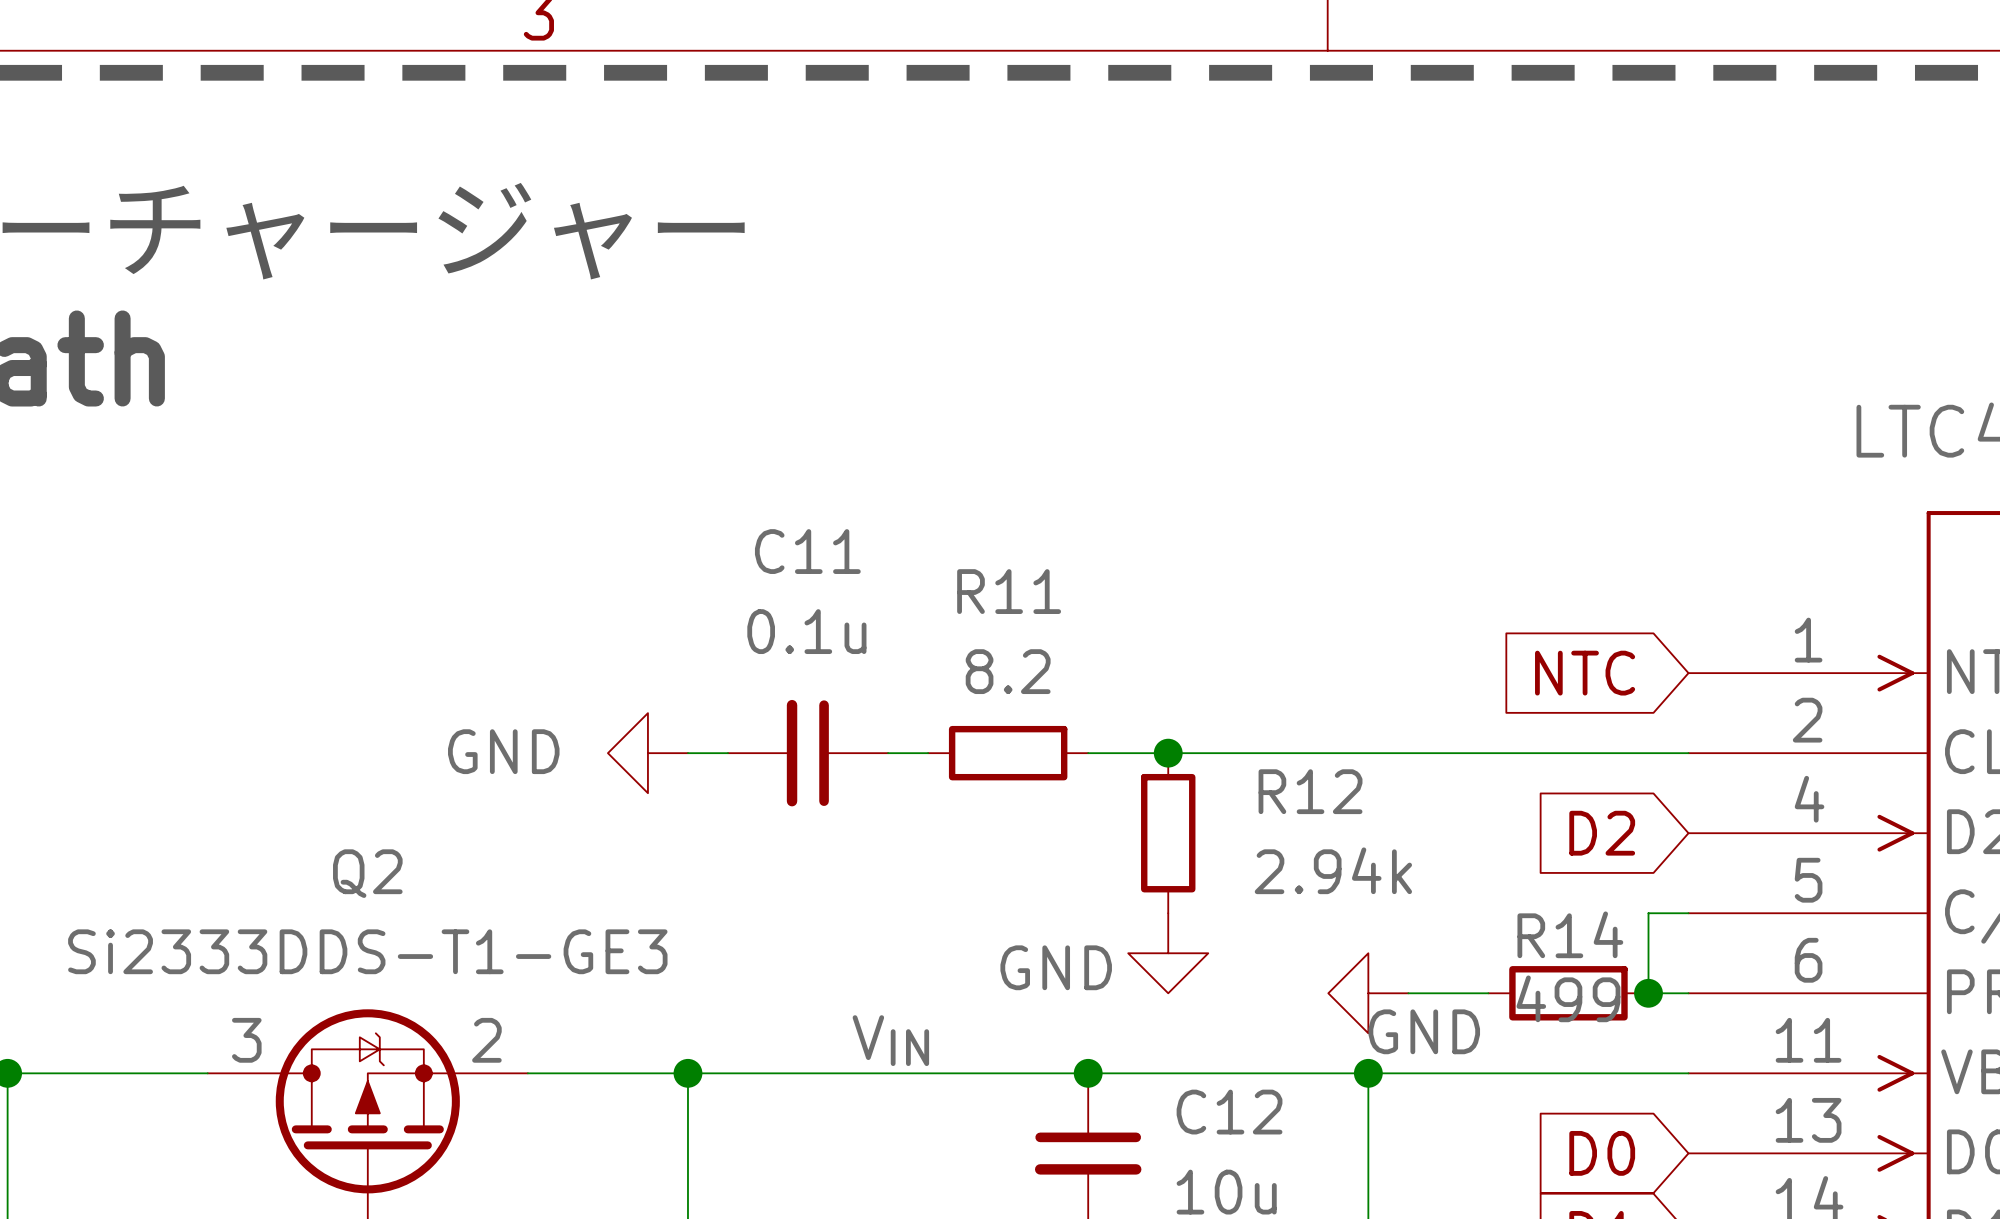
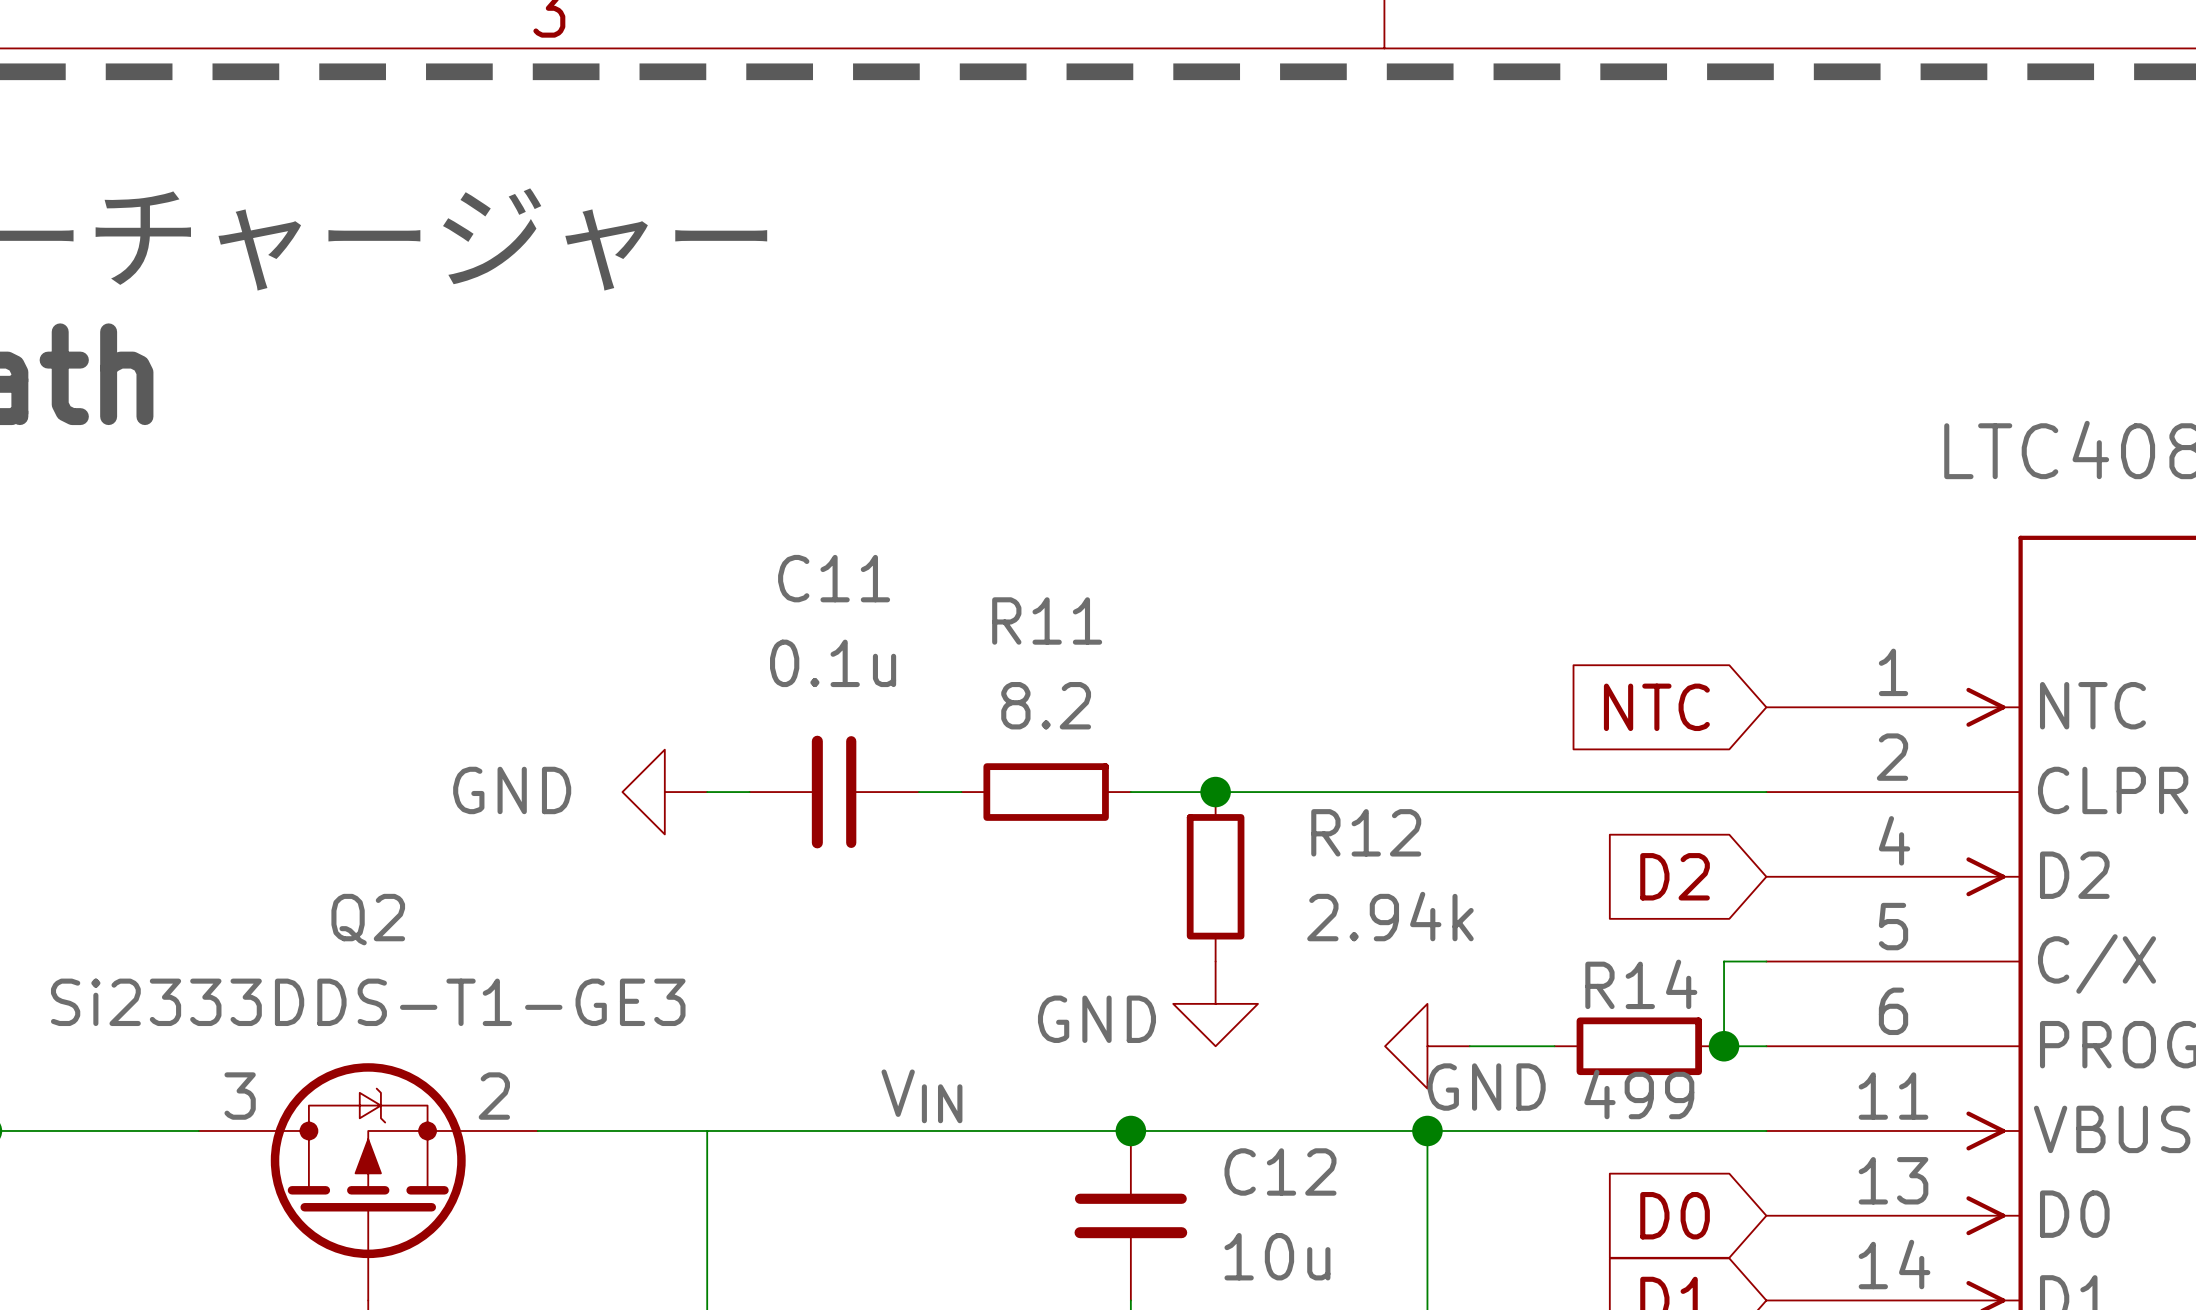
R14 value position: 499 (1568, 998) -> 499 (1639, 1094)
junction: (687, 1073) -> none

